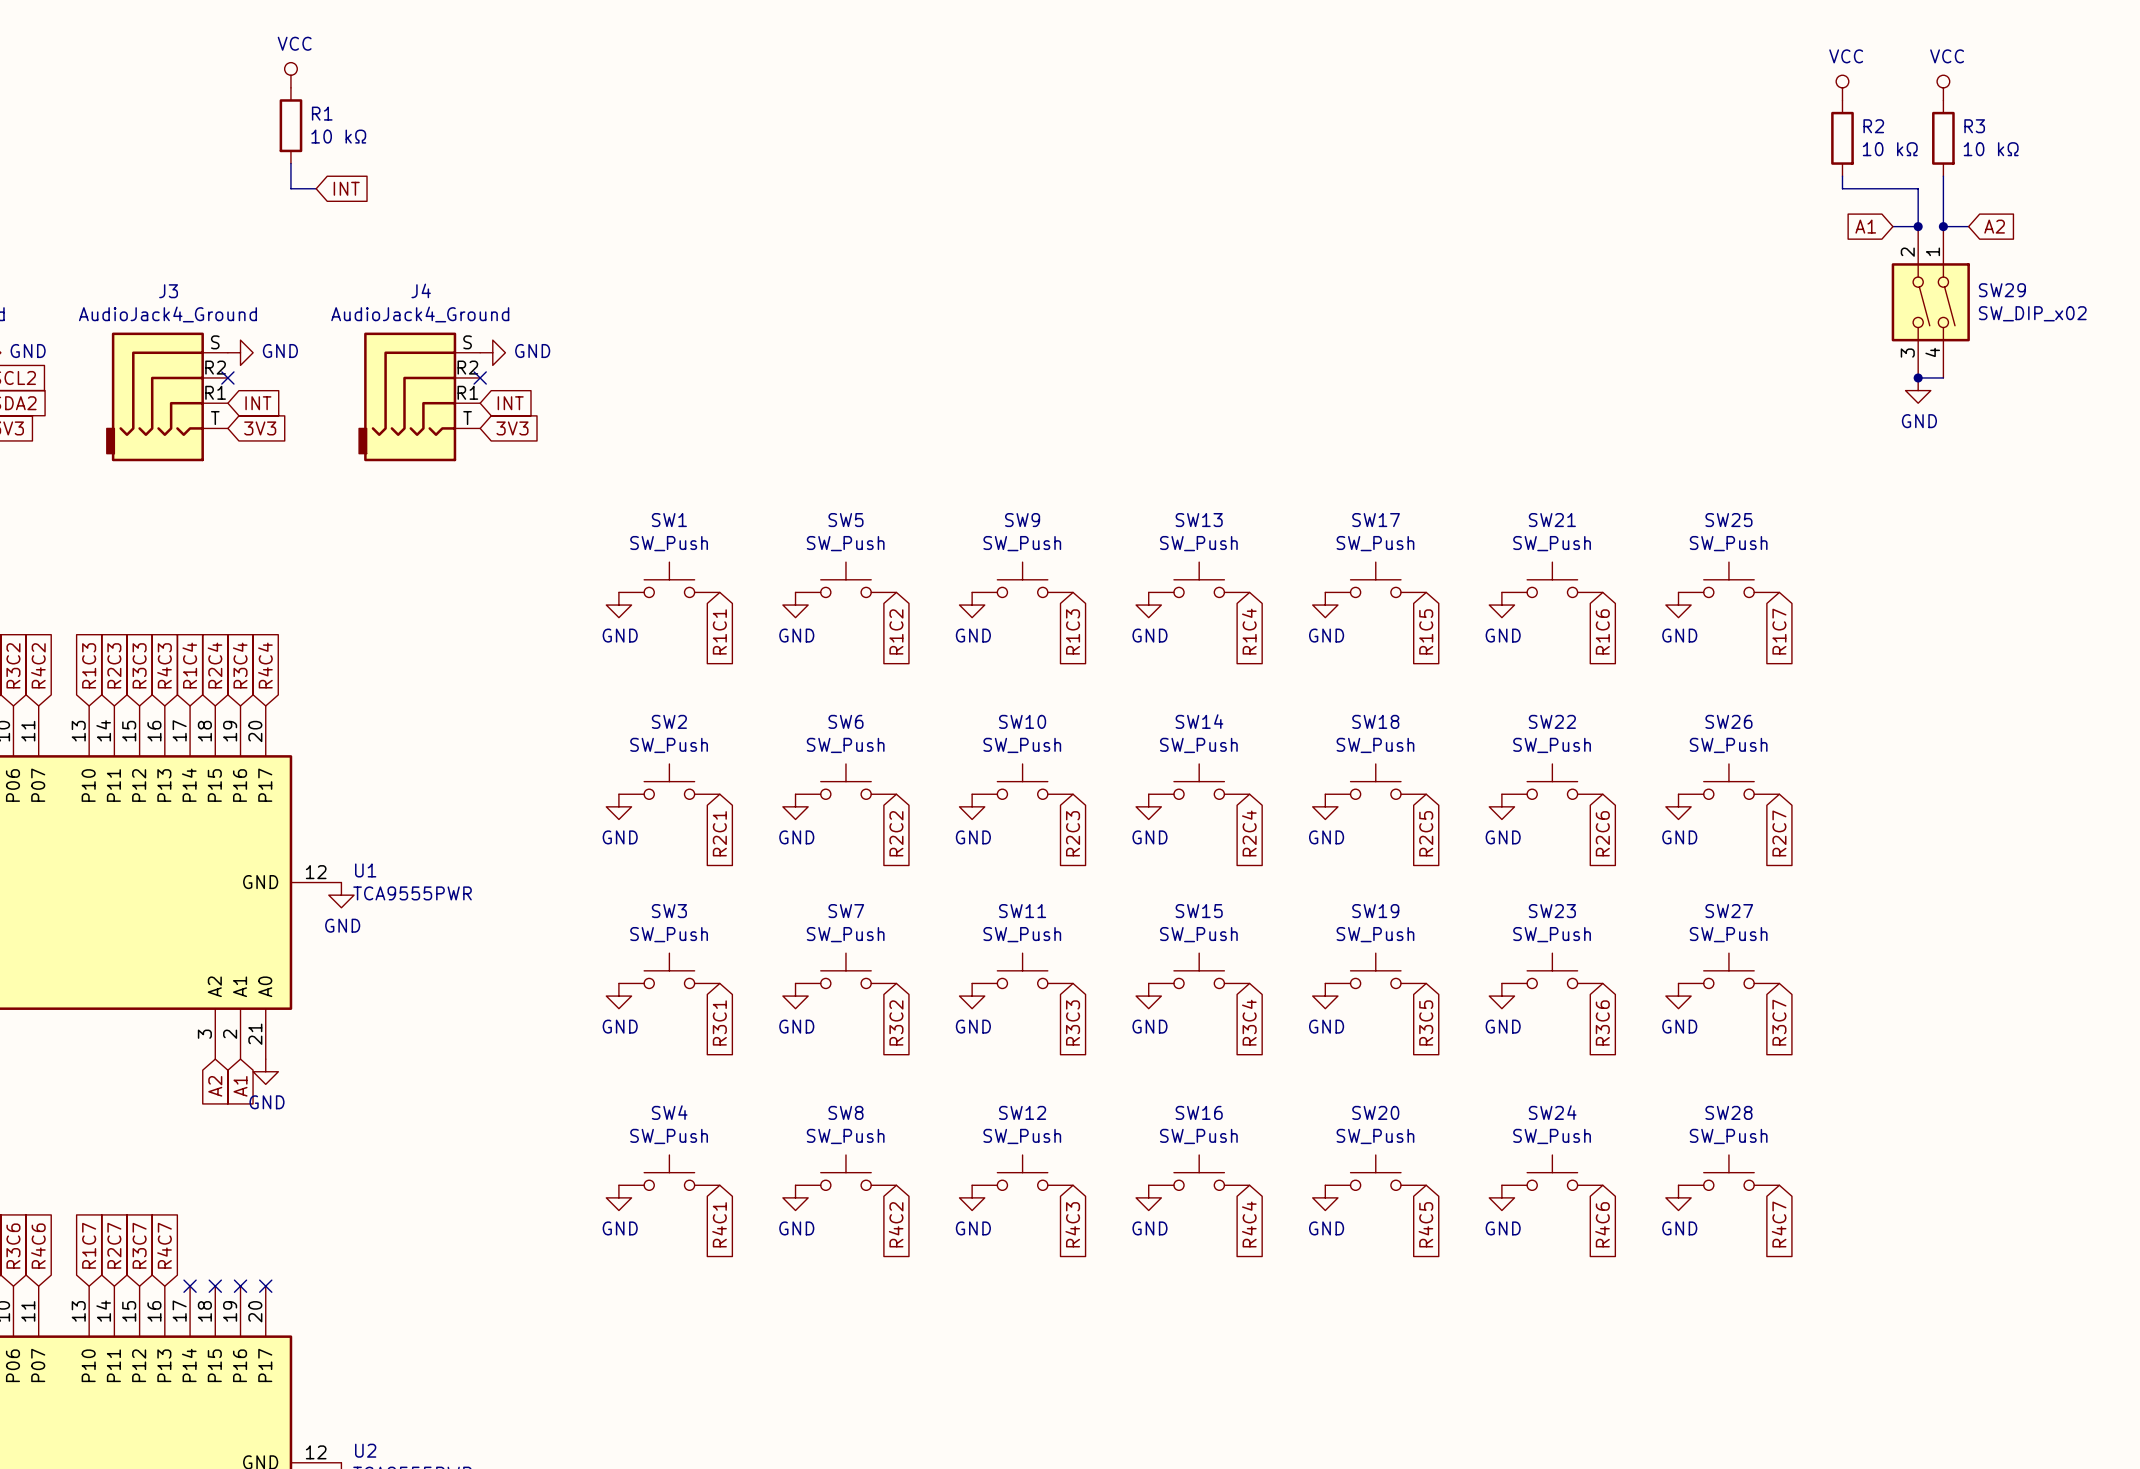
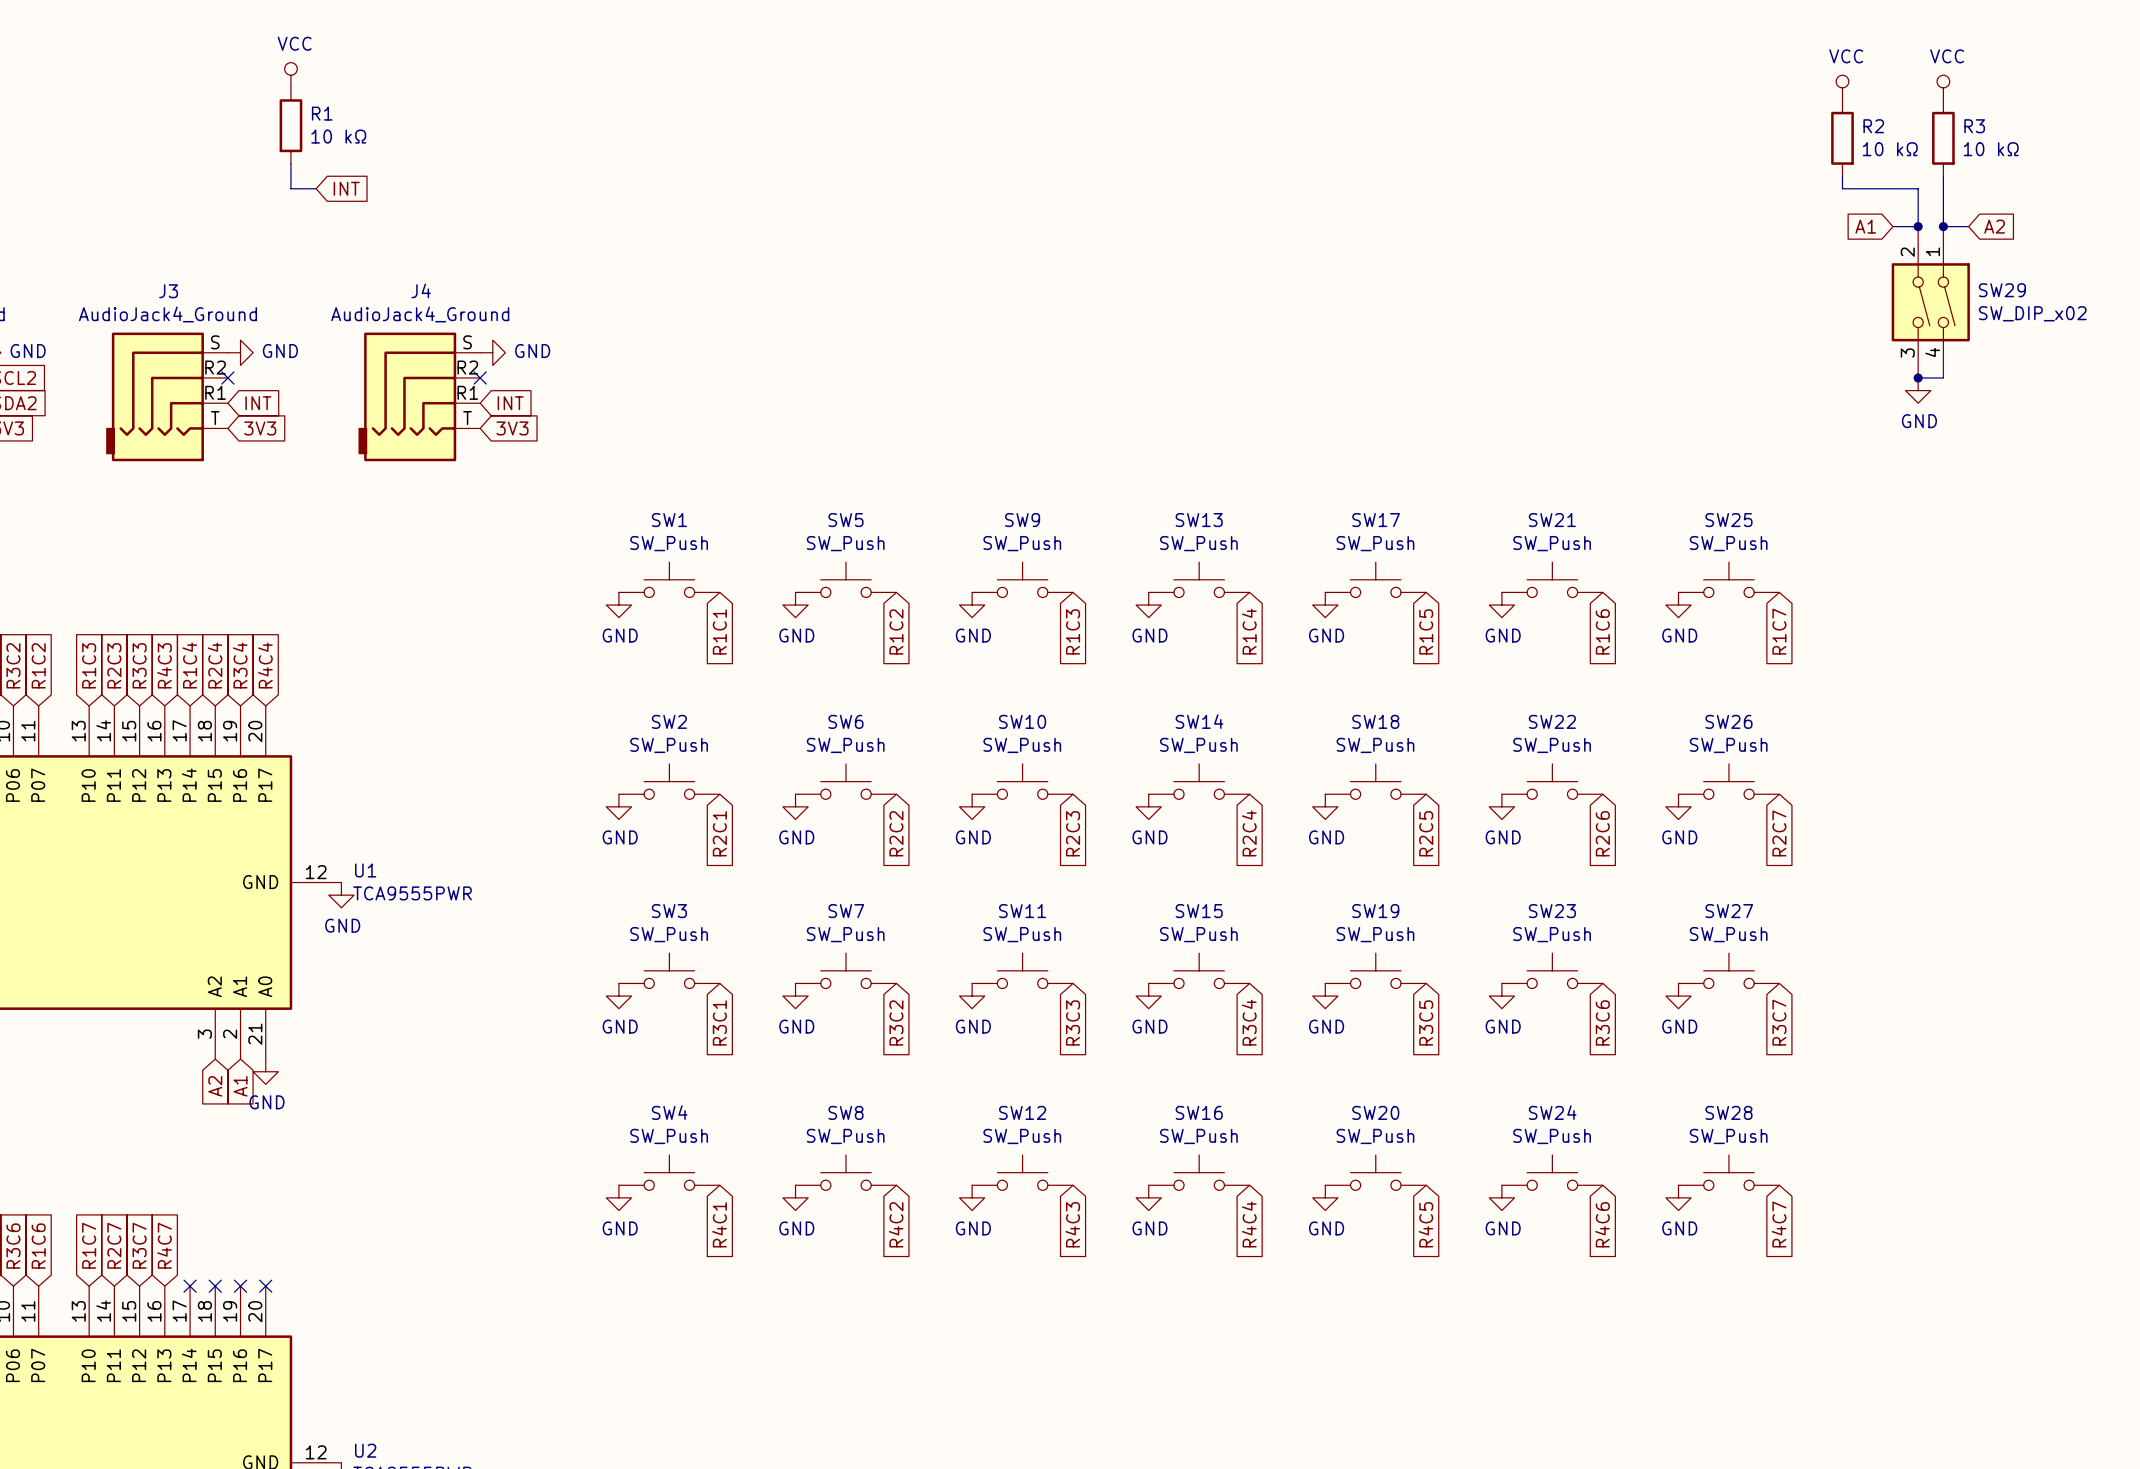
global label: R4C2 (38, 665) -> R1C2 (38, 665)
global label: R4C6 (38, 1246) -> R1C6 (38, 1246)

